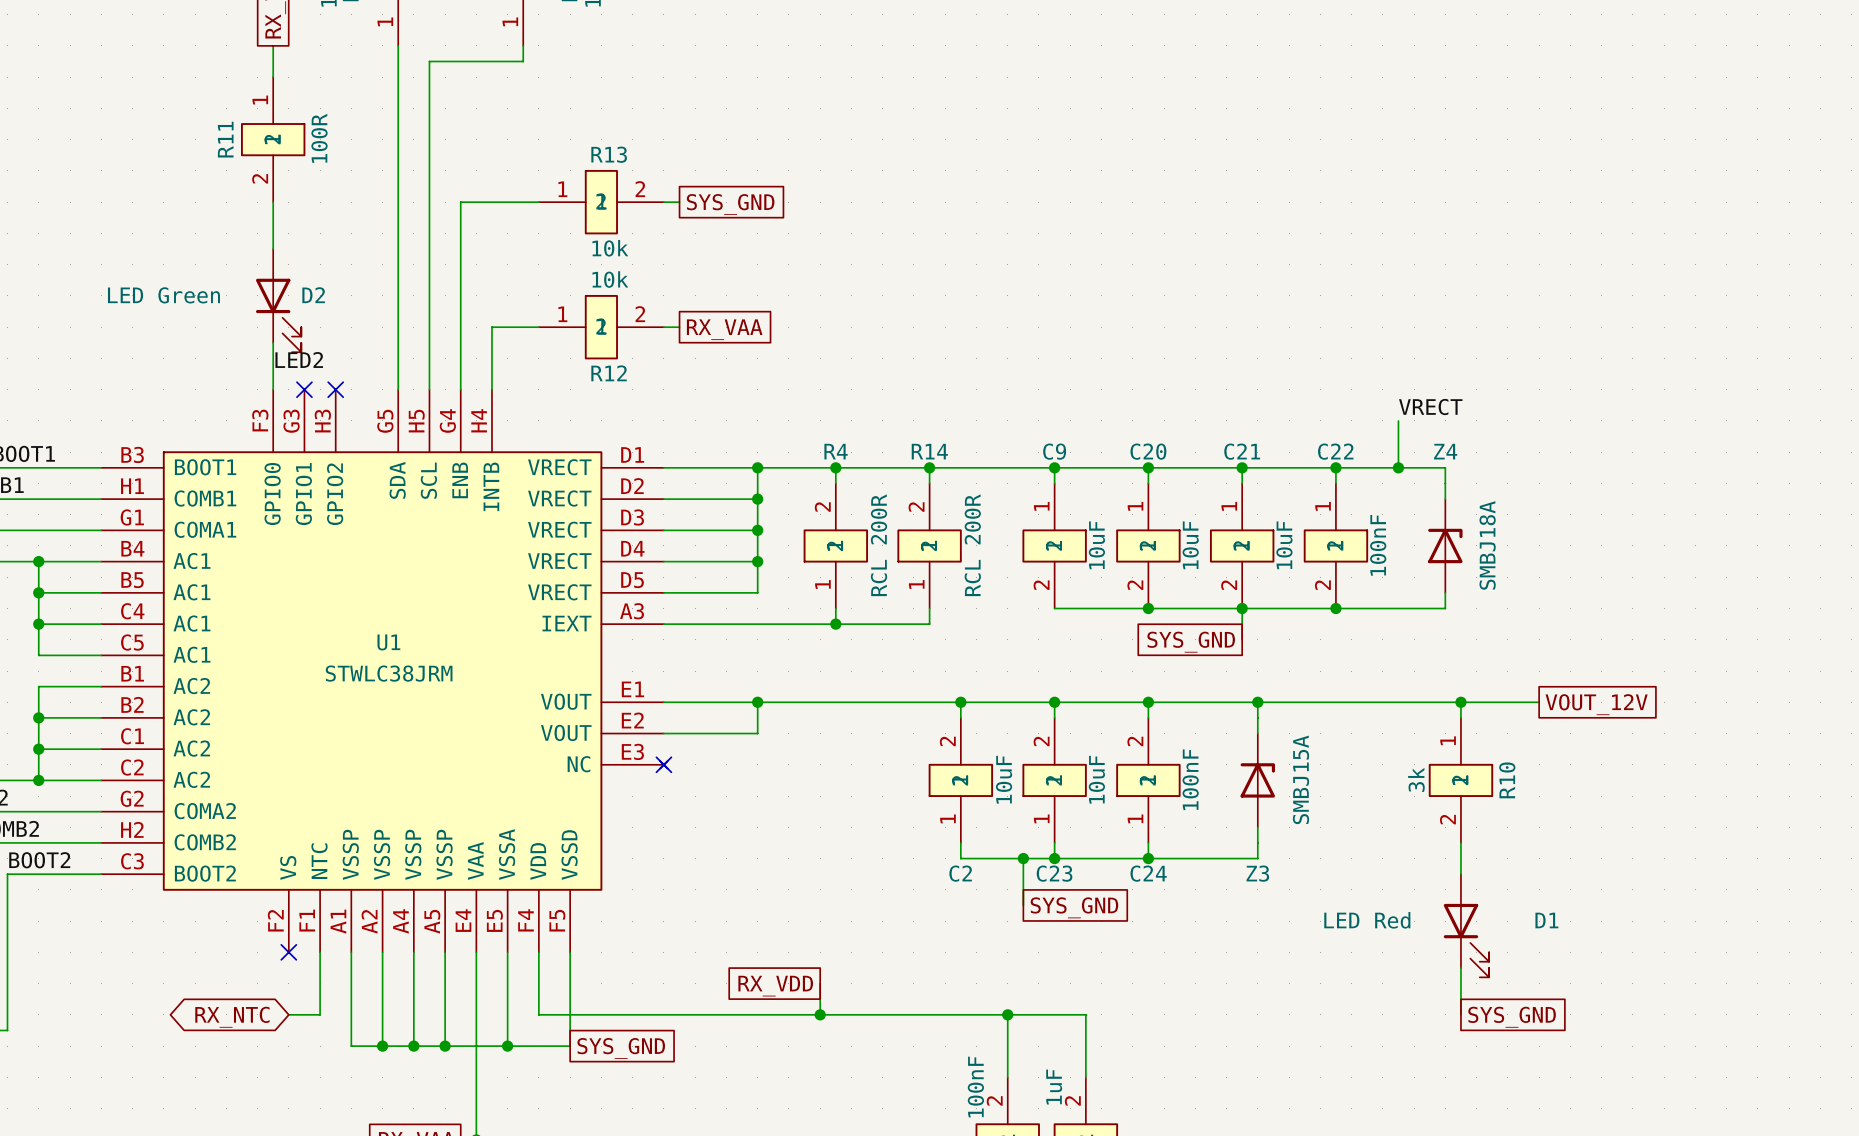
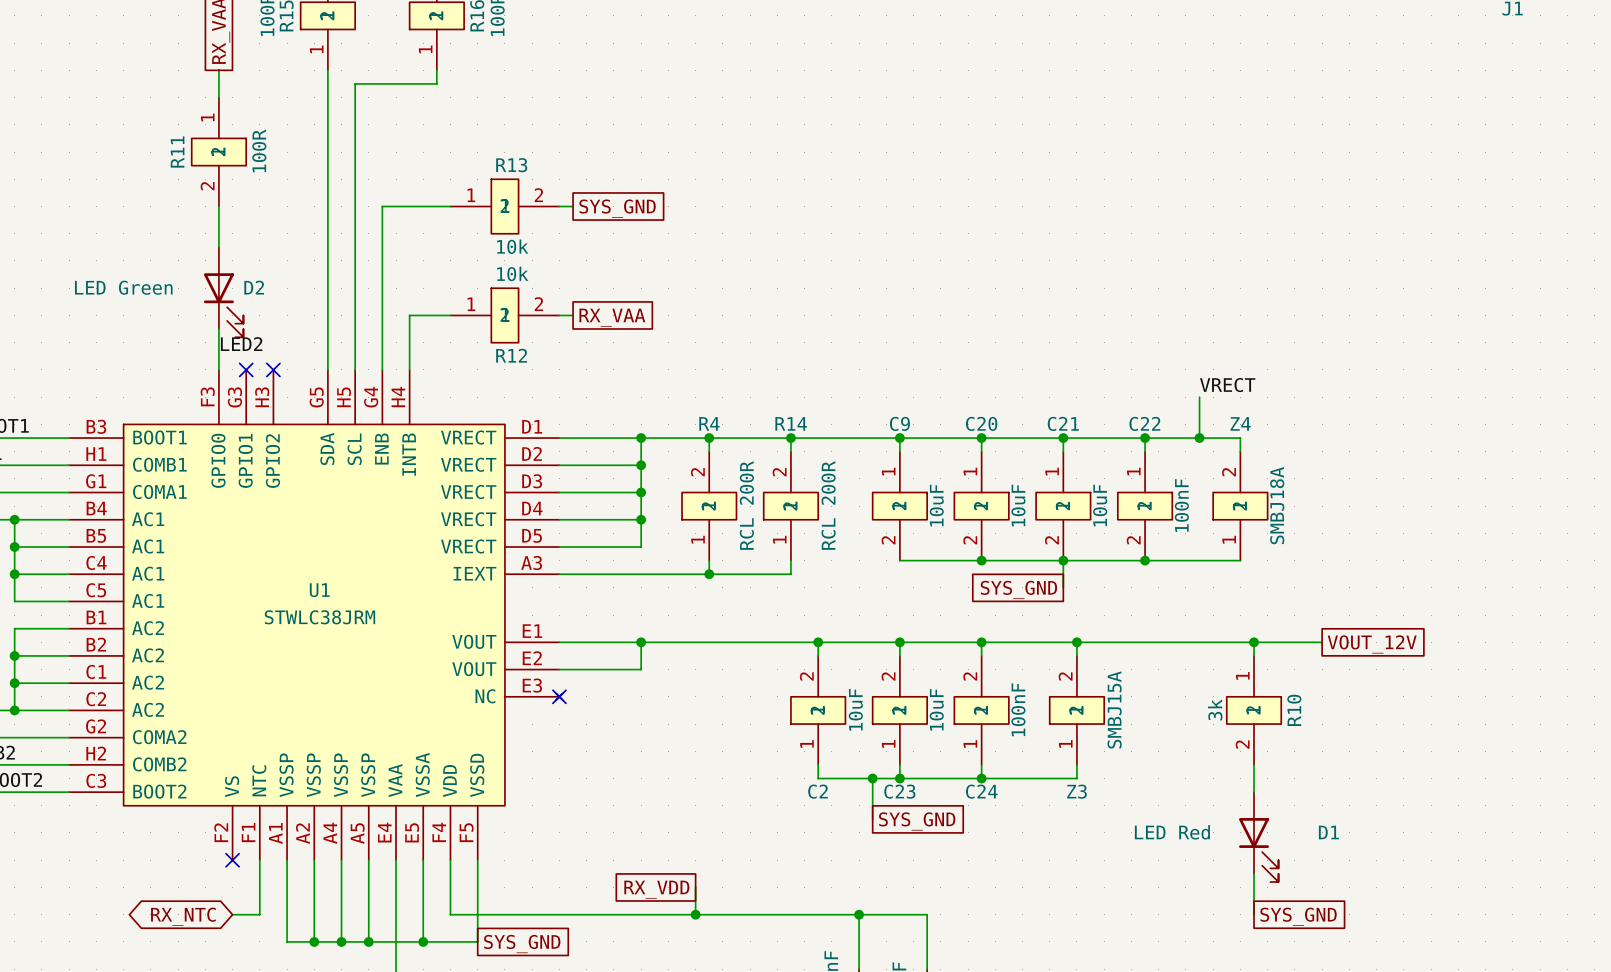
Z4 symbol: [1428, 499, 1463, 593] -> [1212, 451, 1269, 561]
Z3 symbol: [1240, 733, 1275, 828] -> [1048, 655, 1106, 765]

